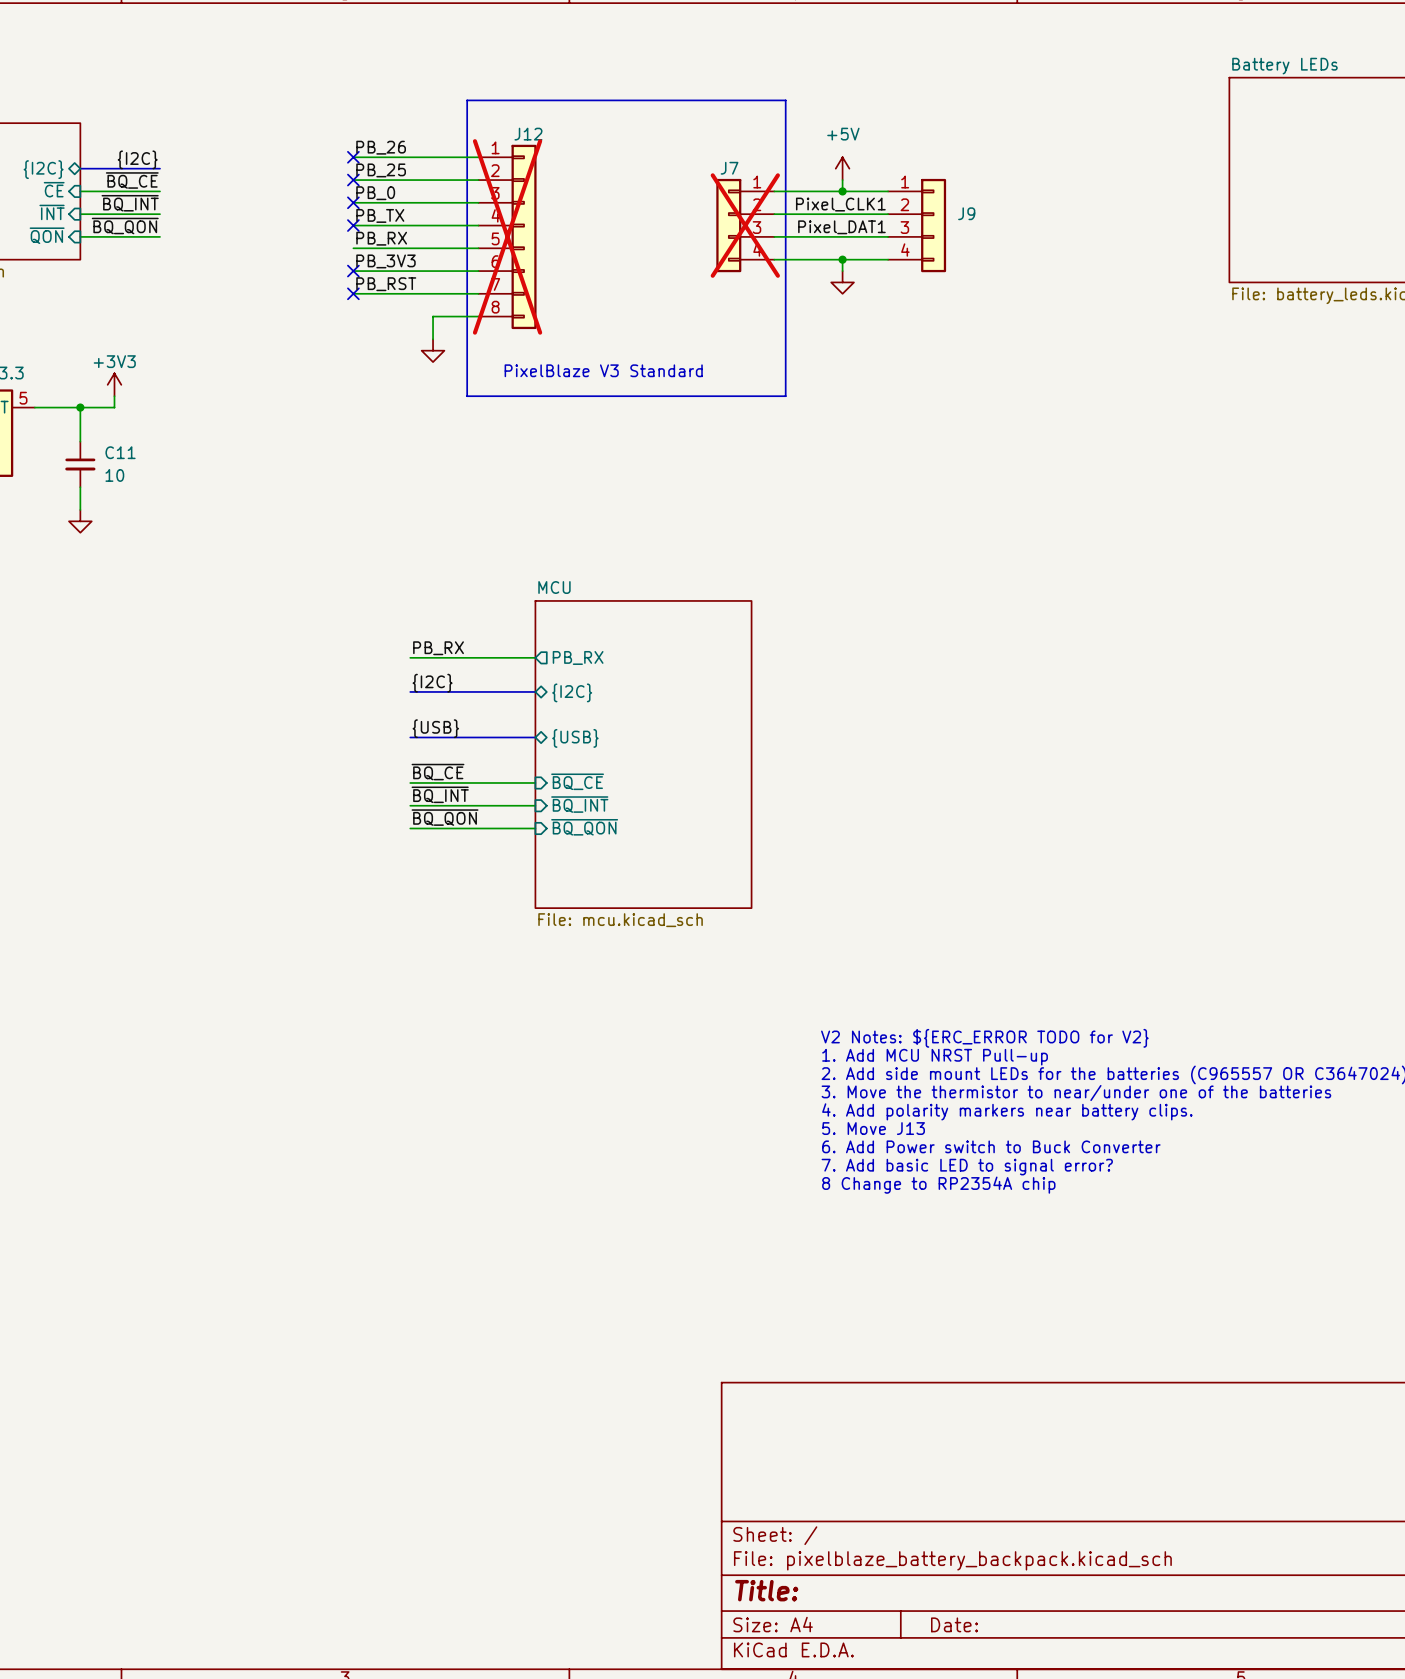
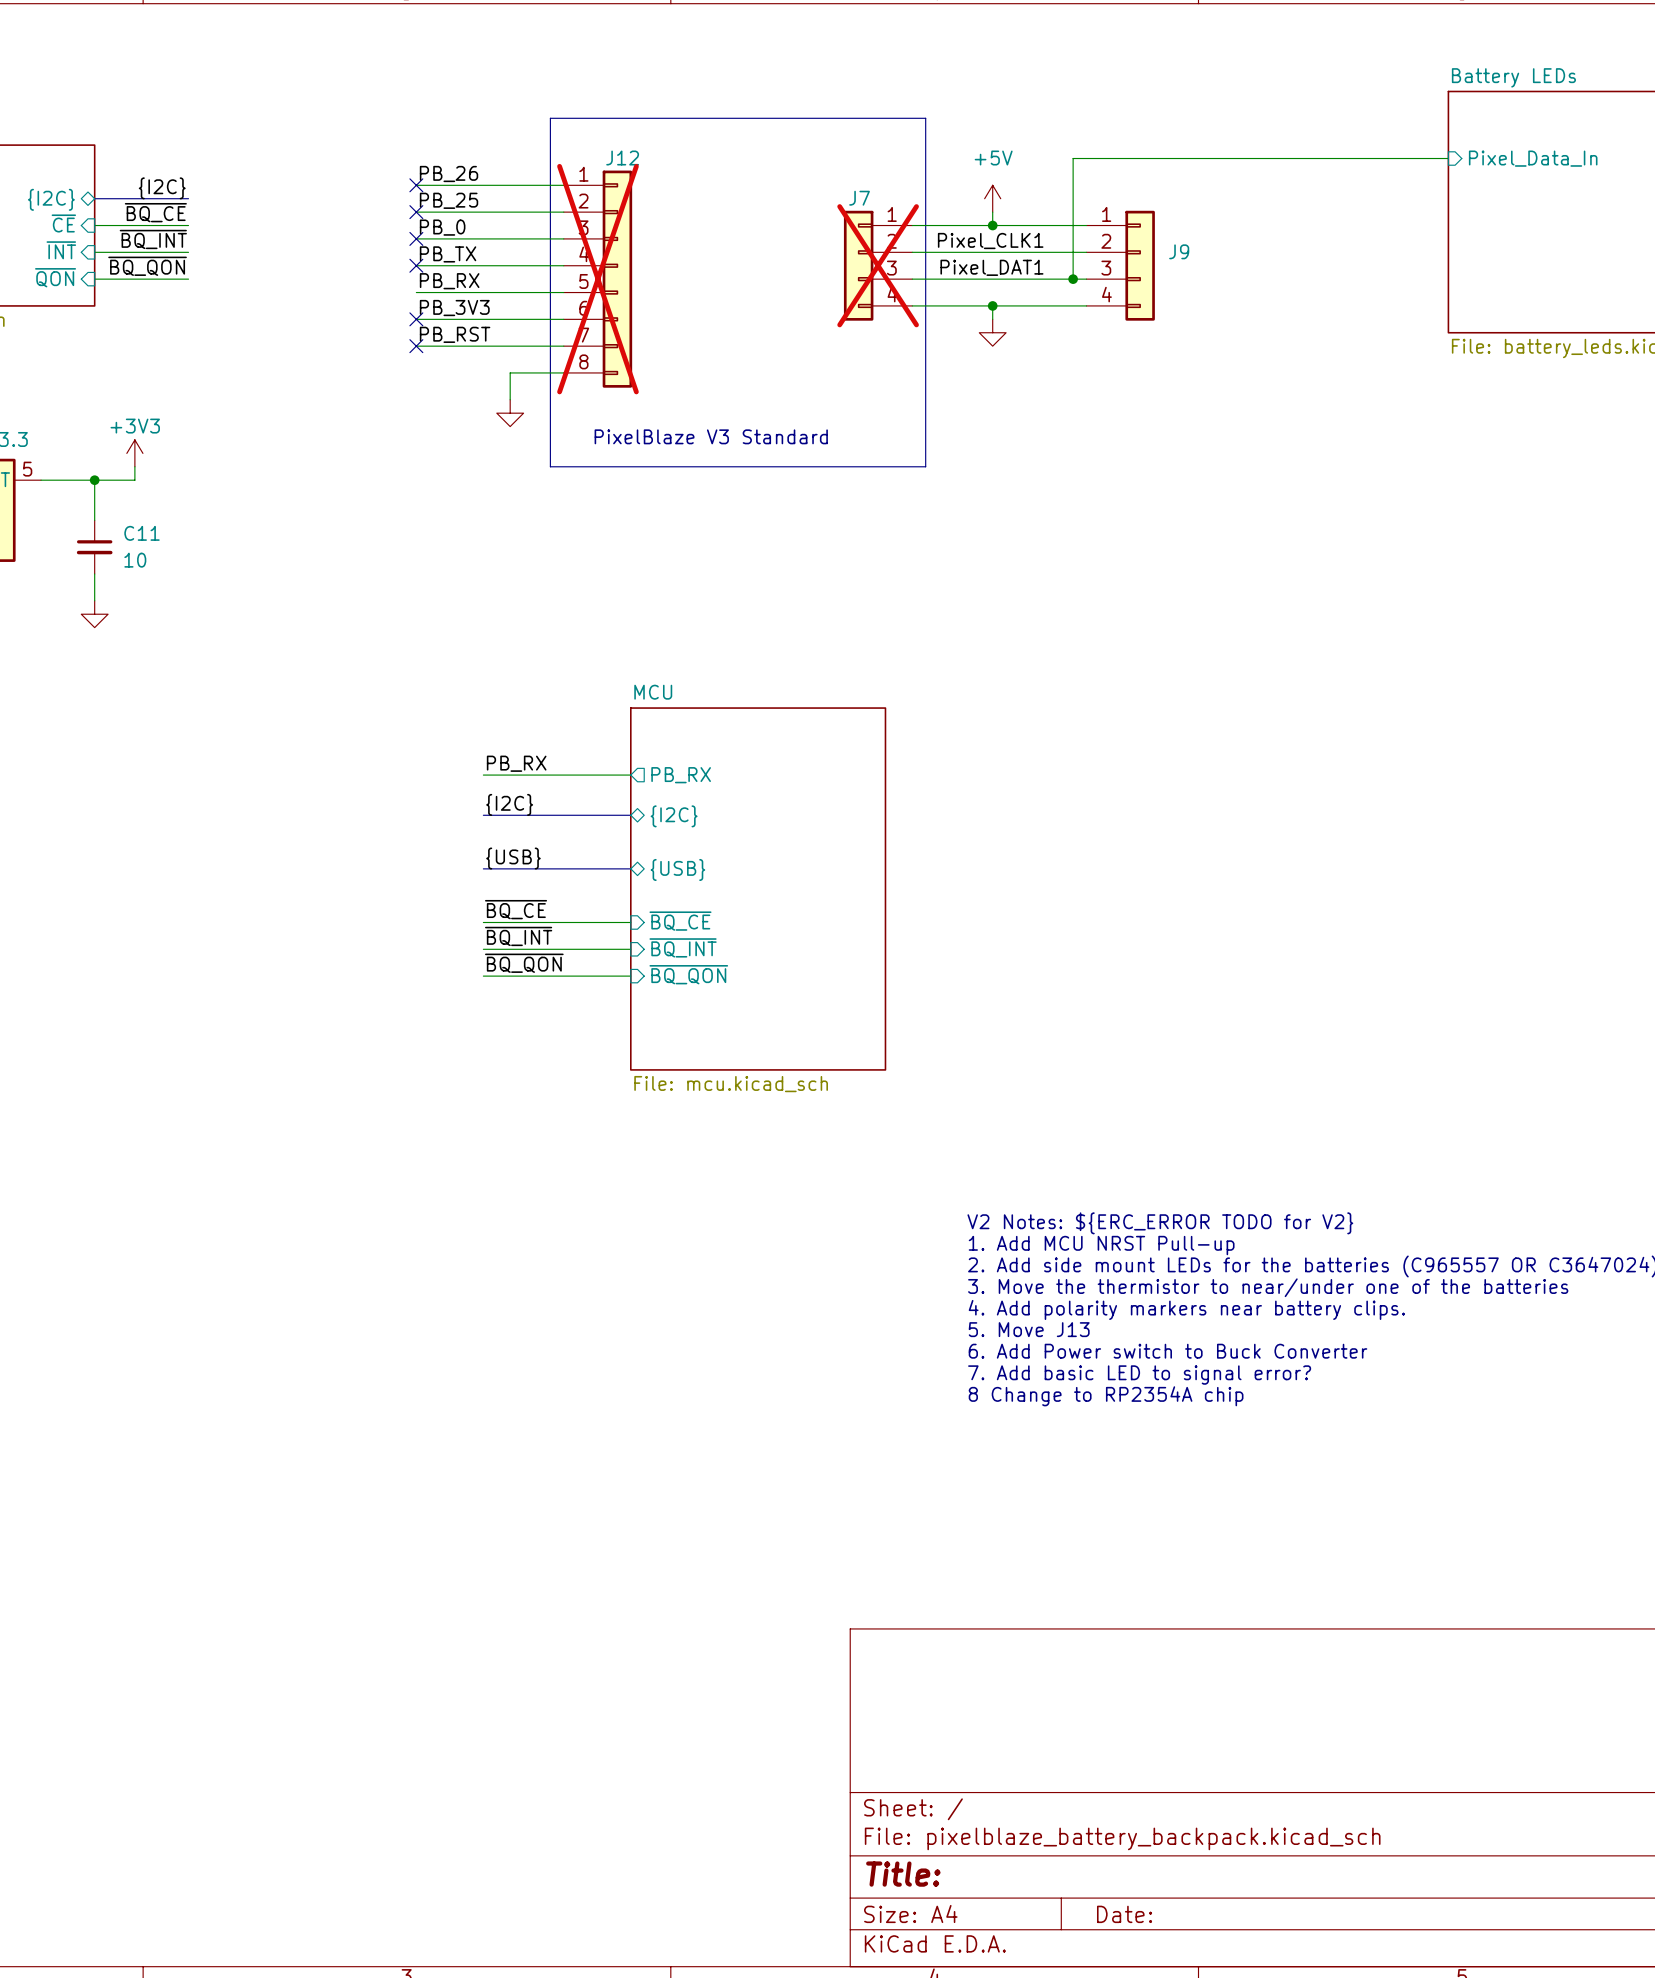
wire: none -> (1448, 158) (1073, 158) (1073, 279)
sheet pin: none -> Pixel_Data_In (1533, 158)
J9 position: (917, 225) -> (1120, 265)
junction: none -> (1073, 279)

